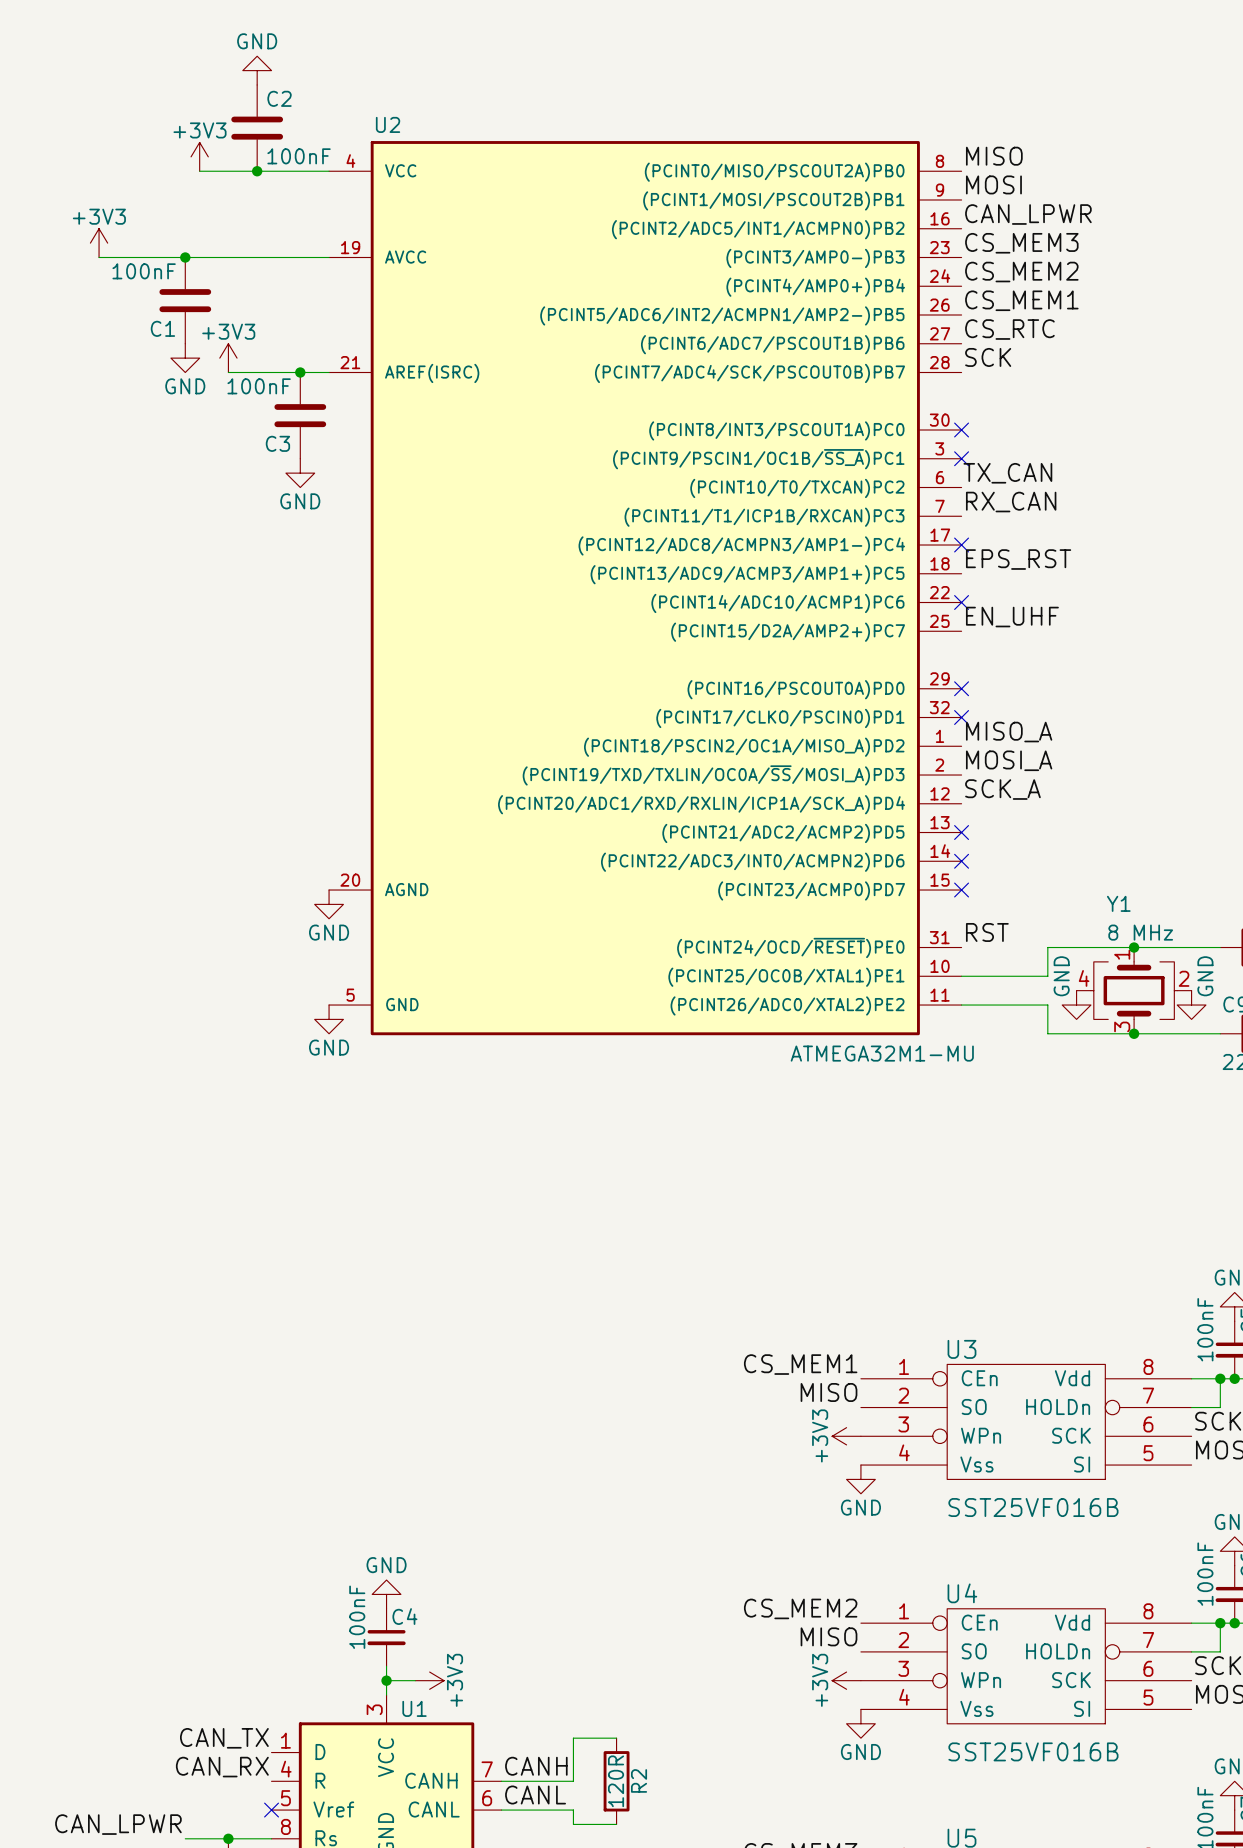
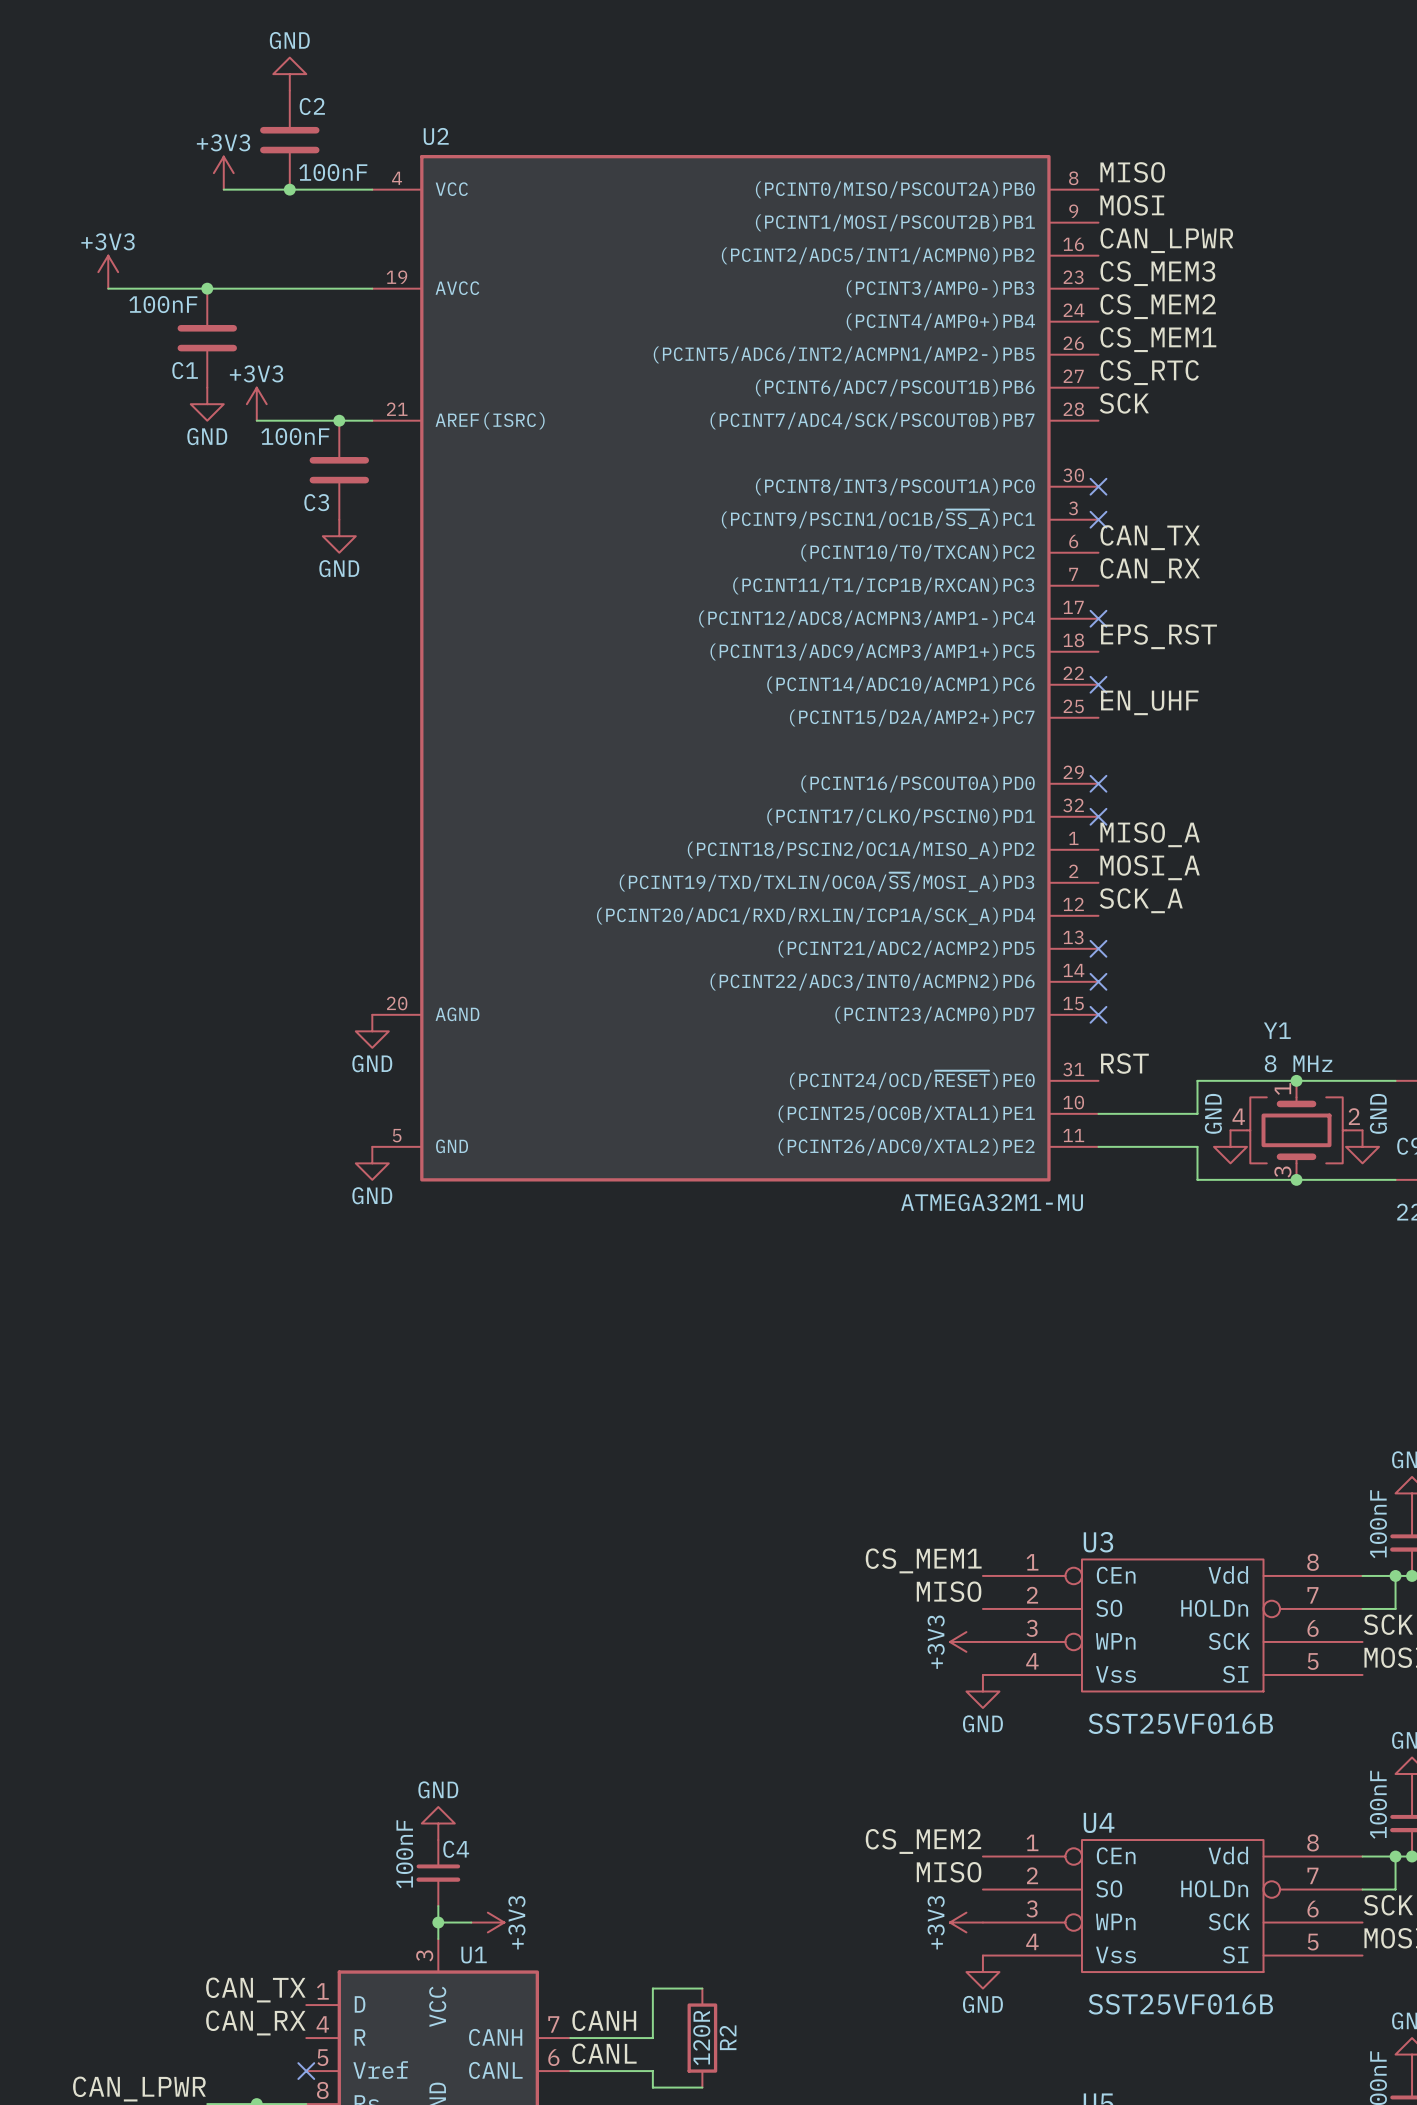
label: TX_CAN (1007, 473) -> CAN_TX (1150, 537)
label: RX_CAN (1011, 502) -> CAN_RX (1150, 570)

